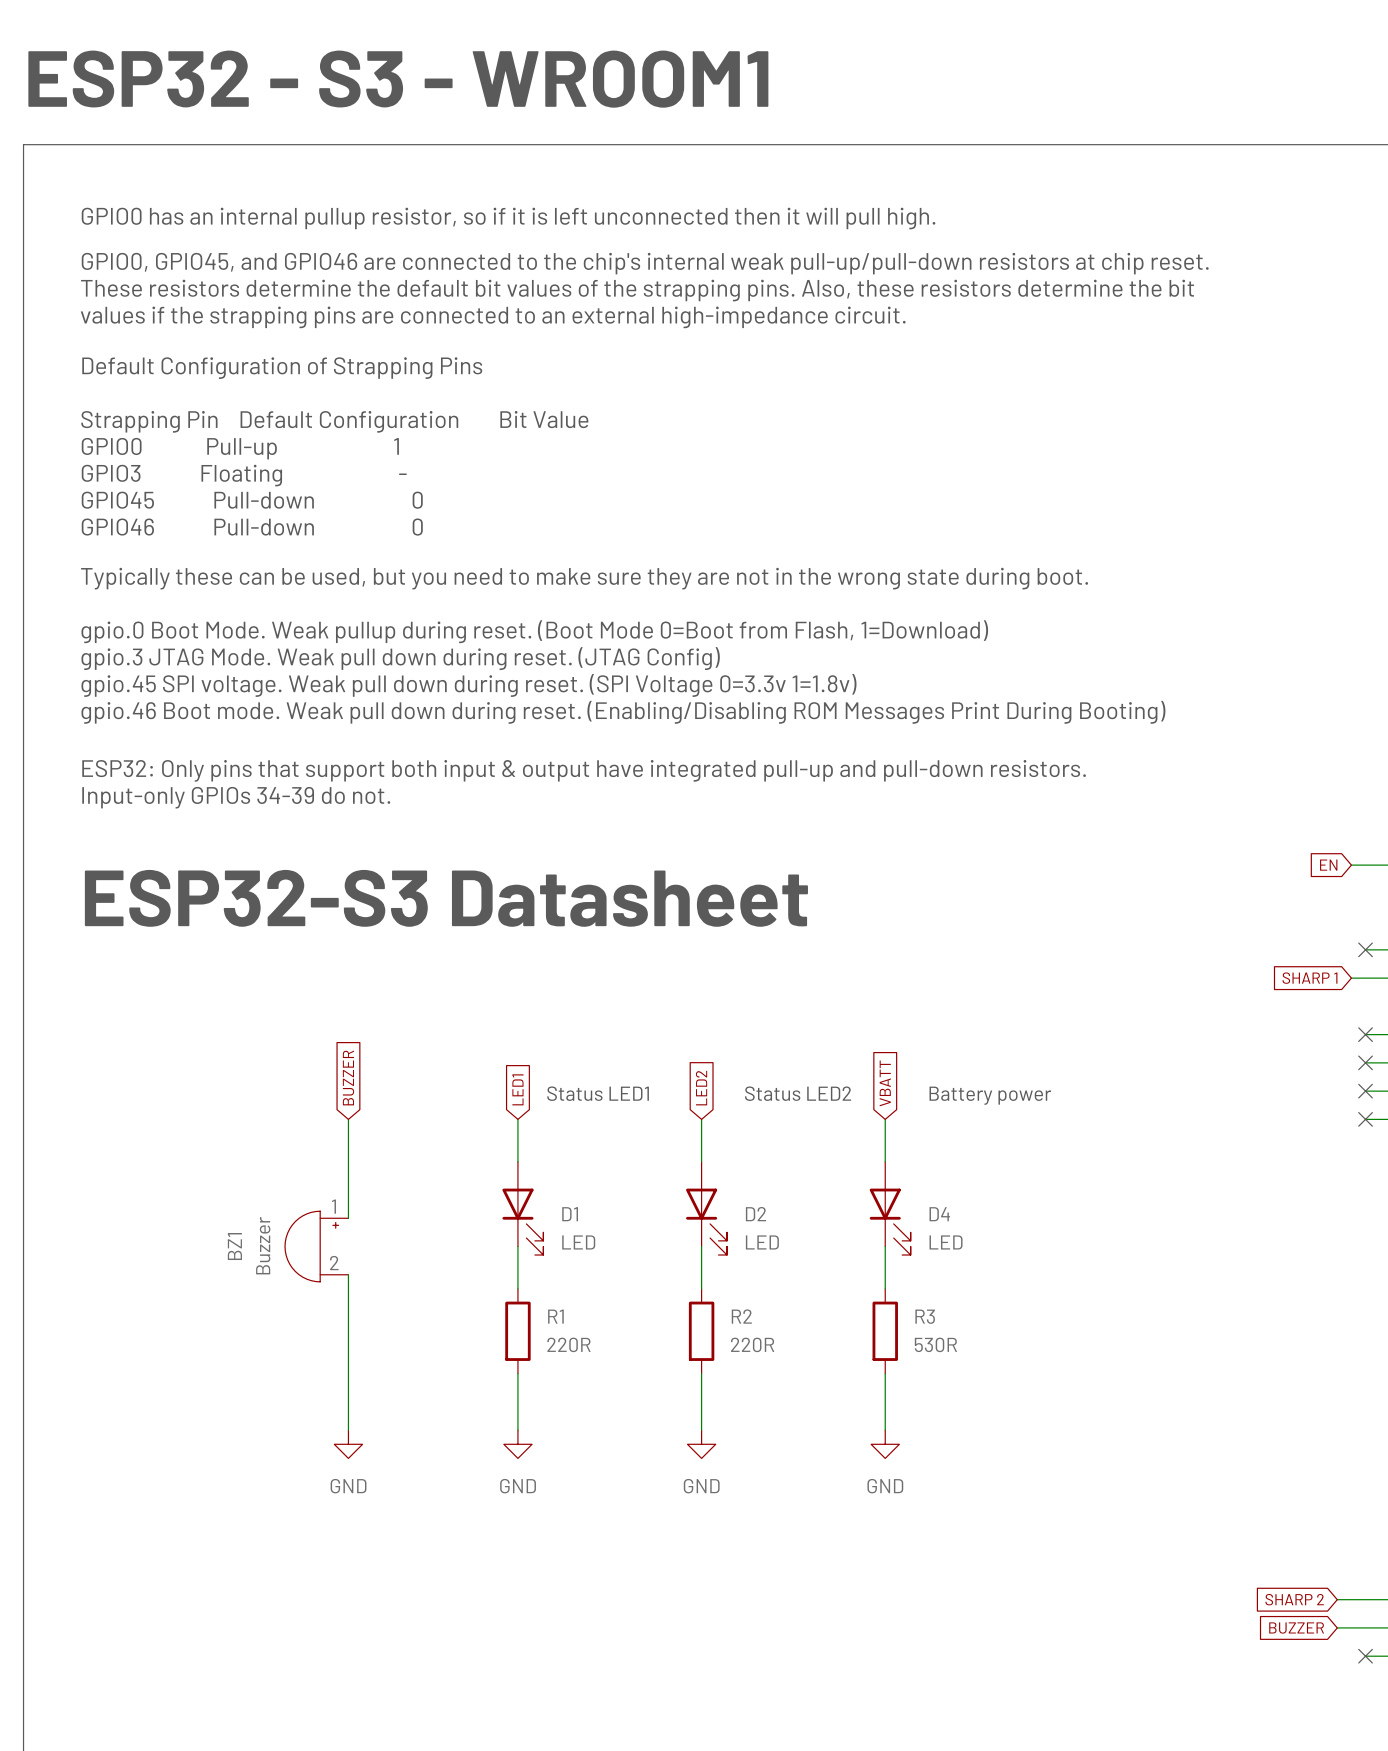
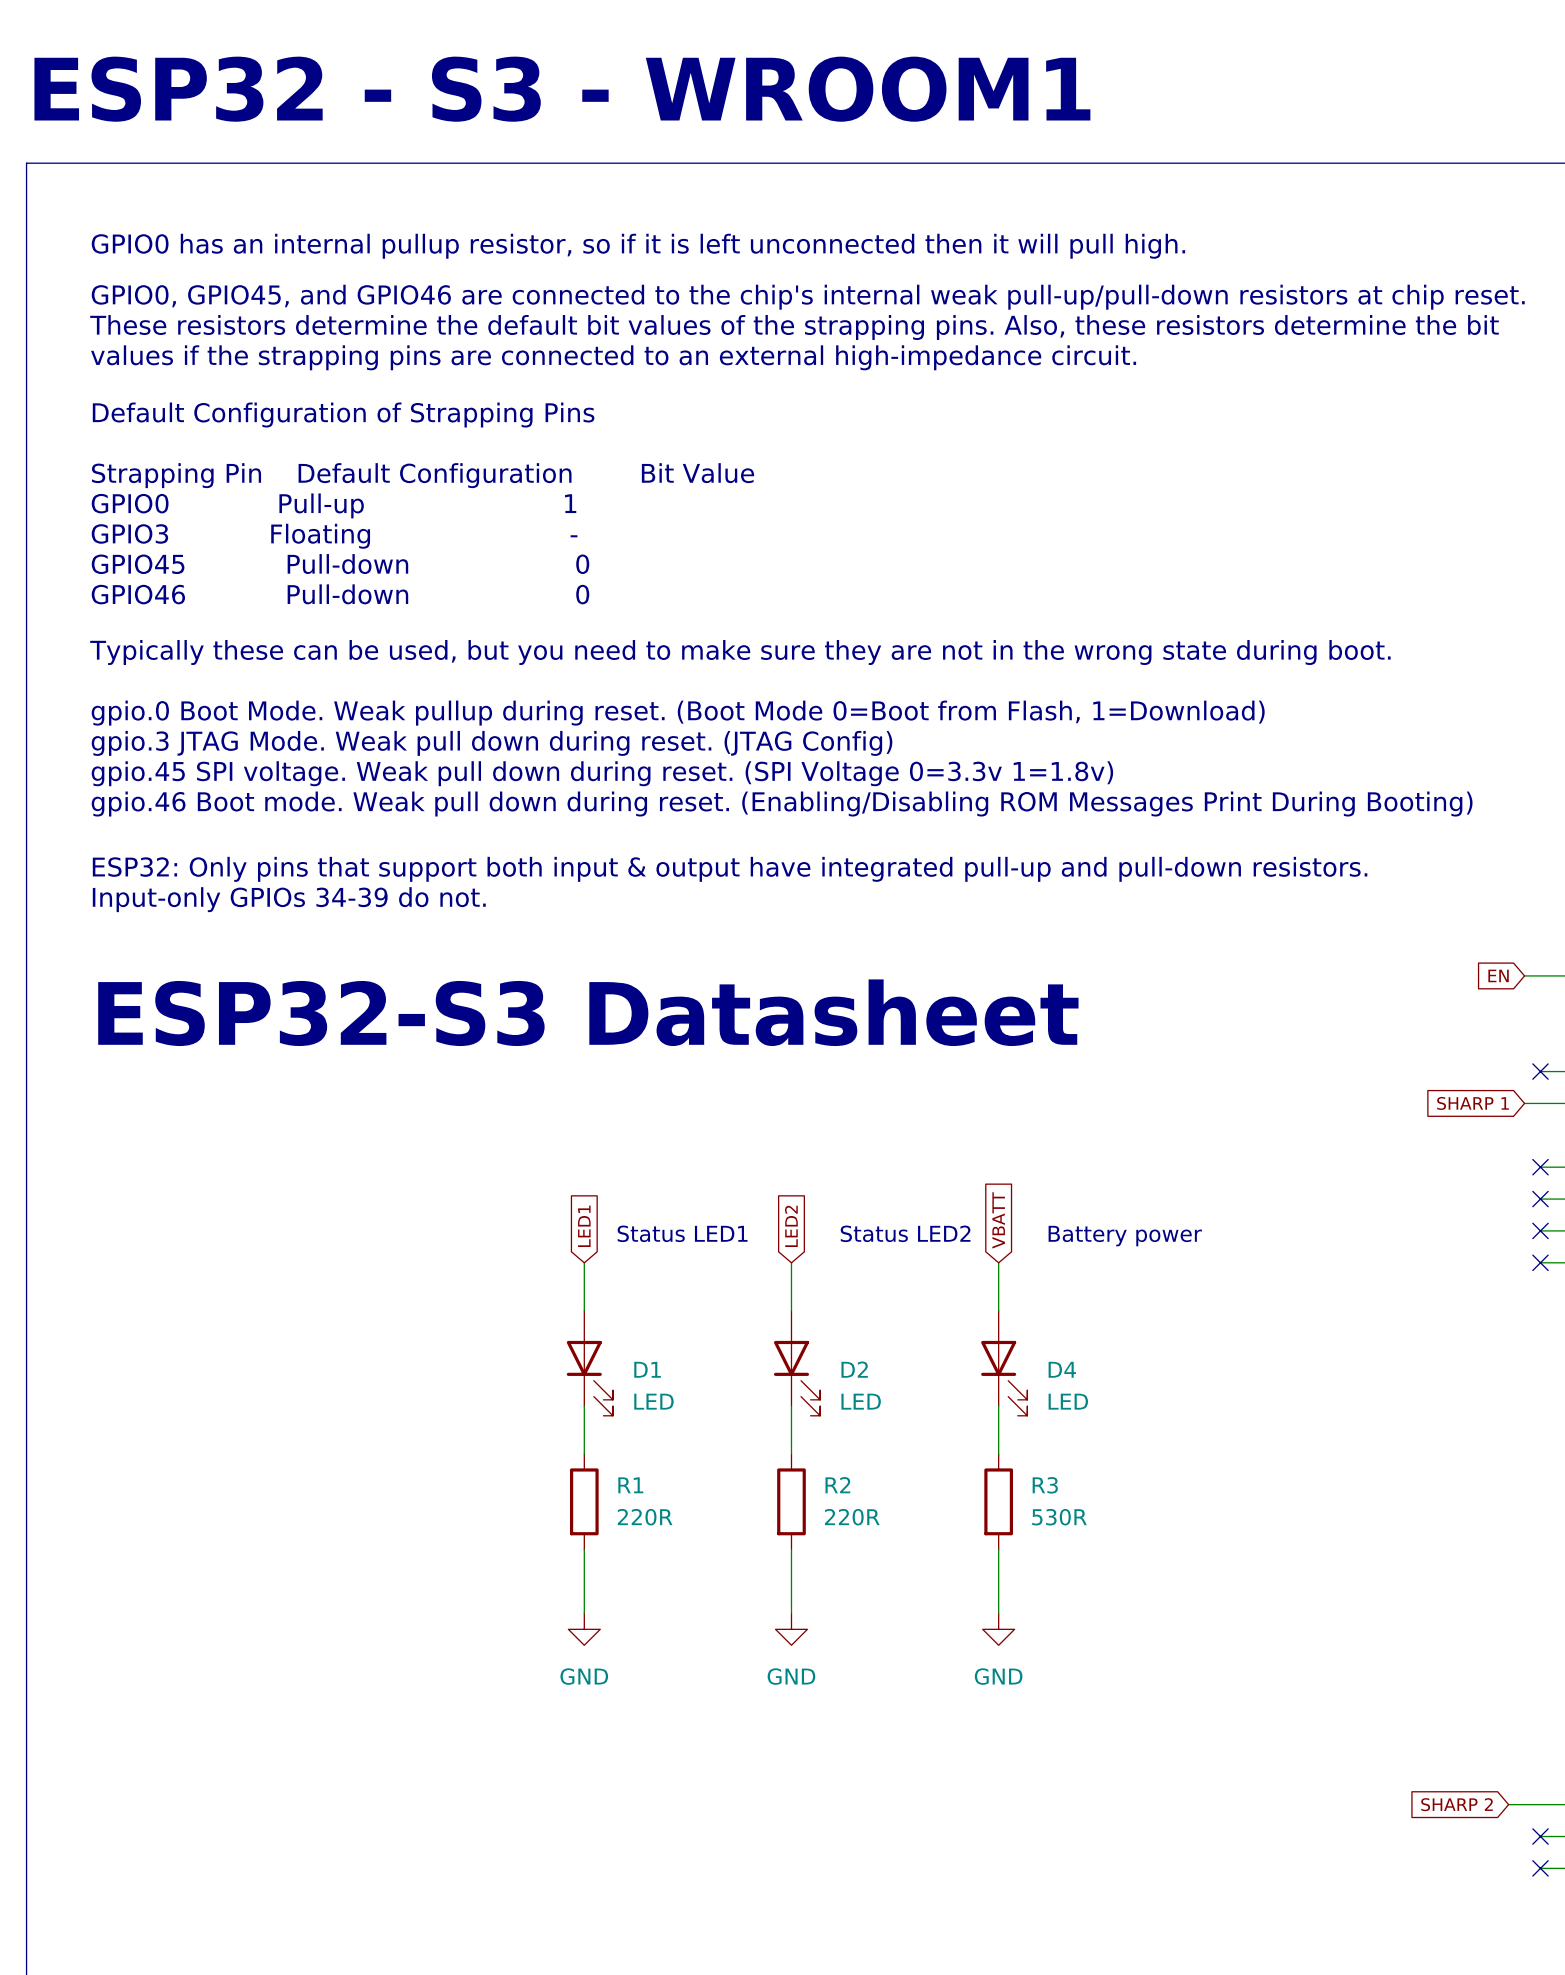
global label: BUZZER (348, 1077) -> none
wire: (348, 1119) (348, 1218) -> none
BZ1: Buzzer (316, 1246) -> none
wire: (348, 1274) (348, 1430) -> none
power symbol: GND (348, 1444) -> none
wire: (1337, 1627) (1365, 1627) -> none
no-connect mark: none -> (1540, 1836)
global label: BUZZER (1296, 1628) -> none

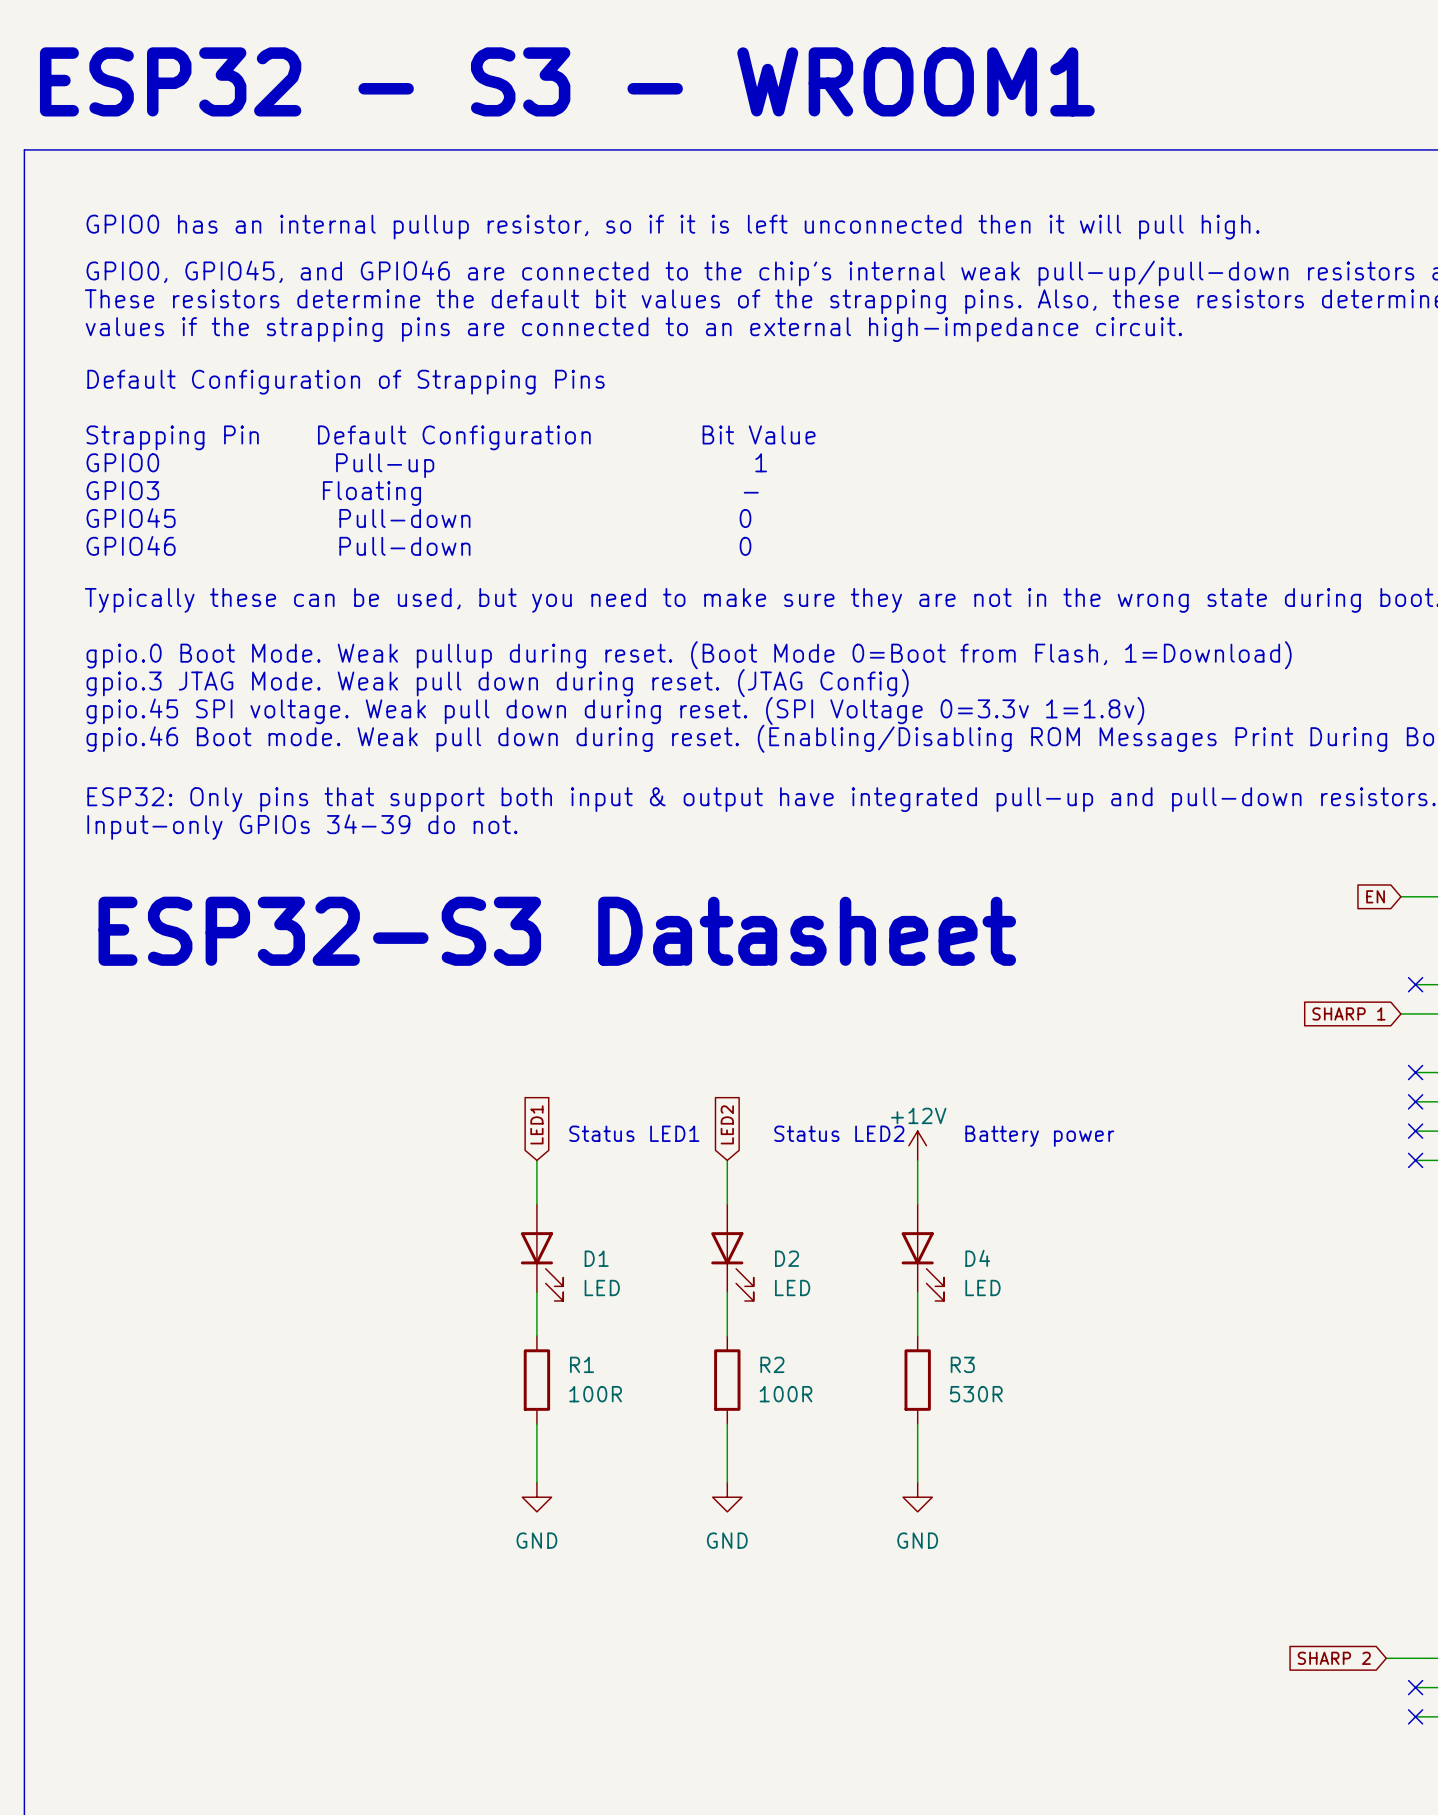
global label: VBATT (998, 1220) -> none
power symbol: none -> +12V (917, 1145)
R1 value: 220R (645, 1517) -> 100R (595, 1394)
R2 value: 220R (852, 1517) -> 100R (785, 1394)

